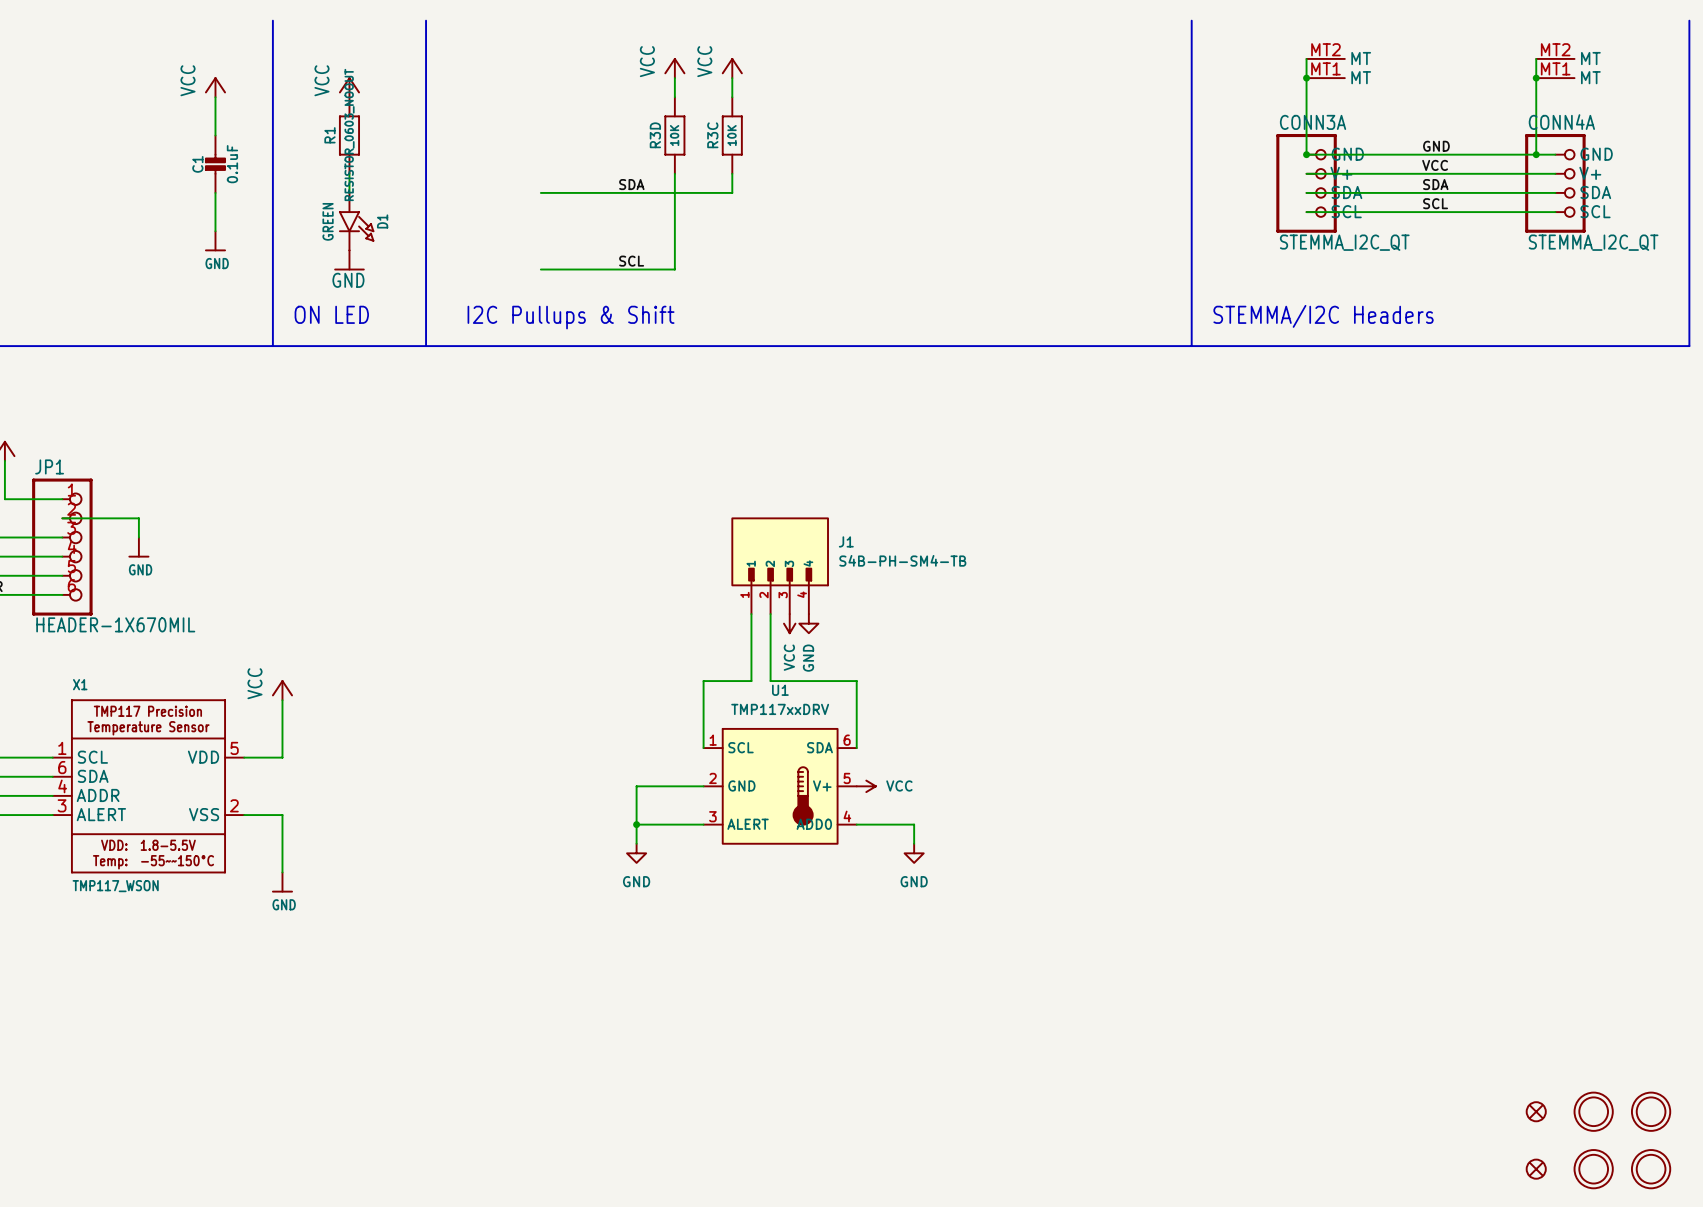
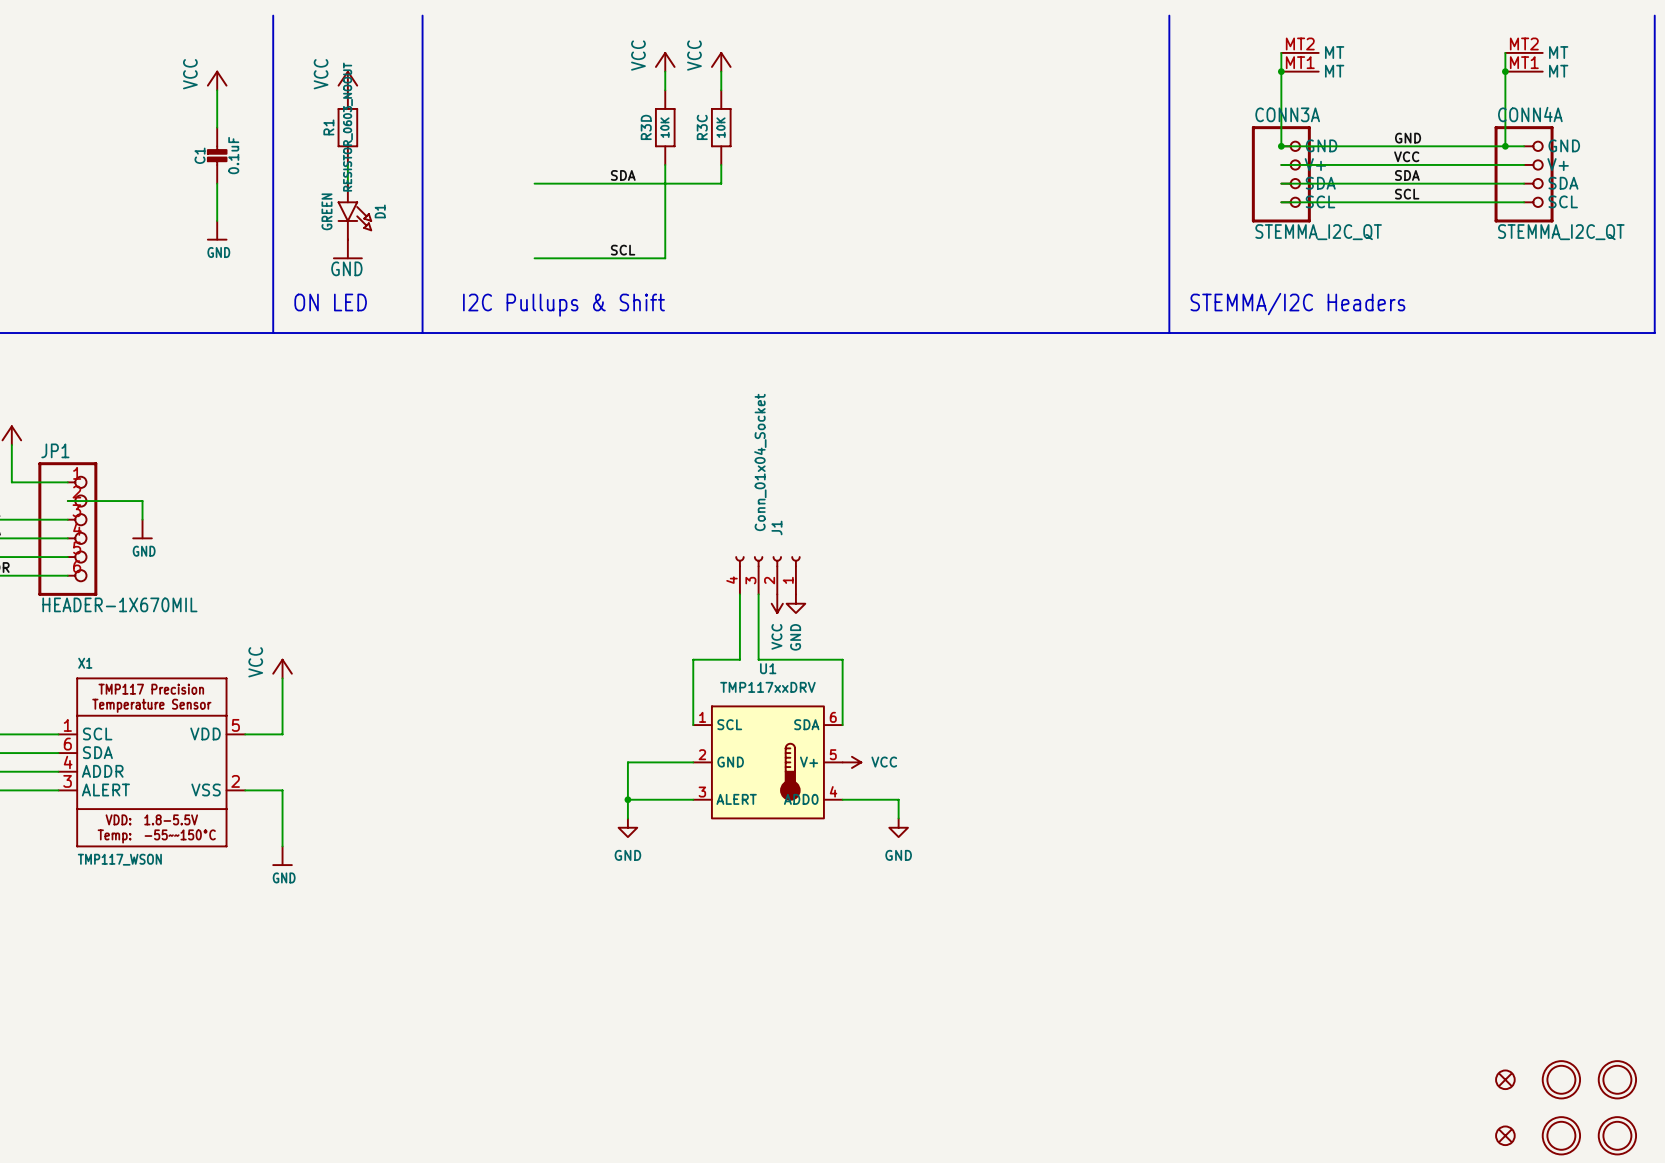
J1 symbol: [731, 517, 829, 615] -> [735, 556, 801, 595]
J1 name position: J1 (846, 541) -> J1 (776, 527)
J1 value: S4B-PH-SM4-TB (902, 560) -> Conn_01x04_Socket (760, 462)

